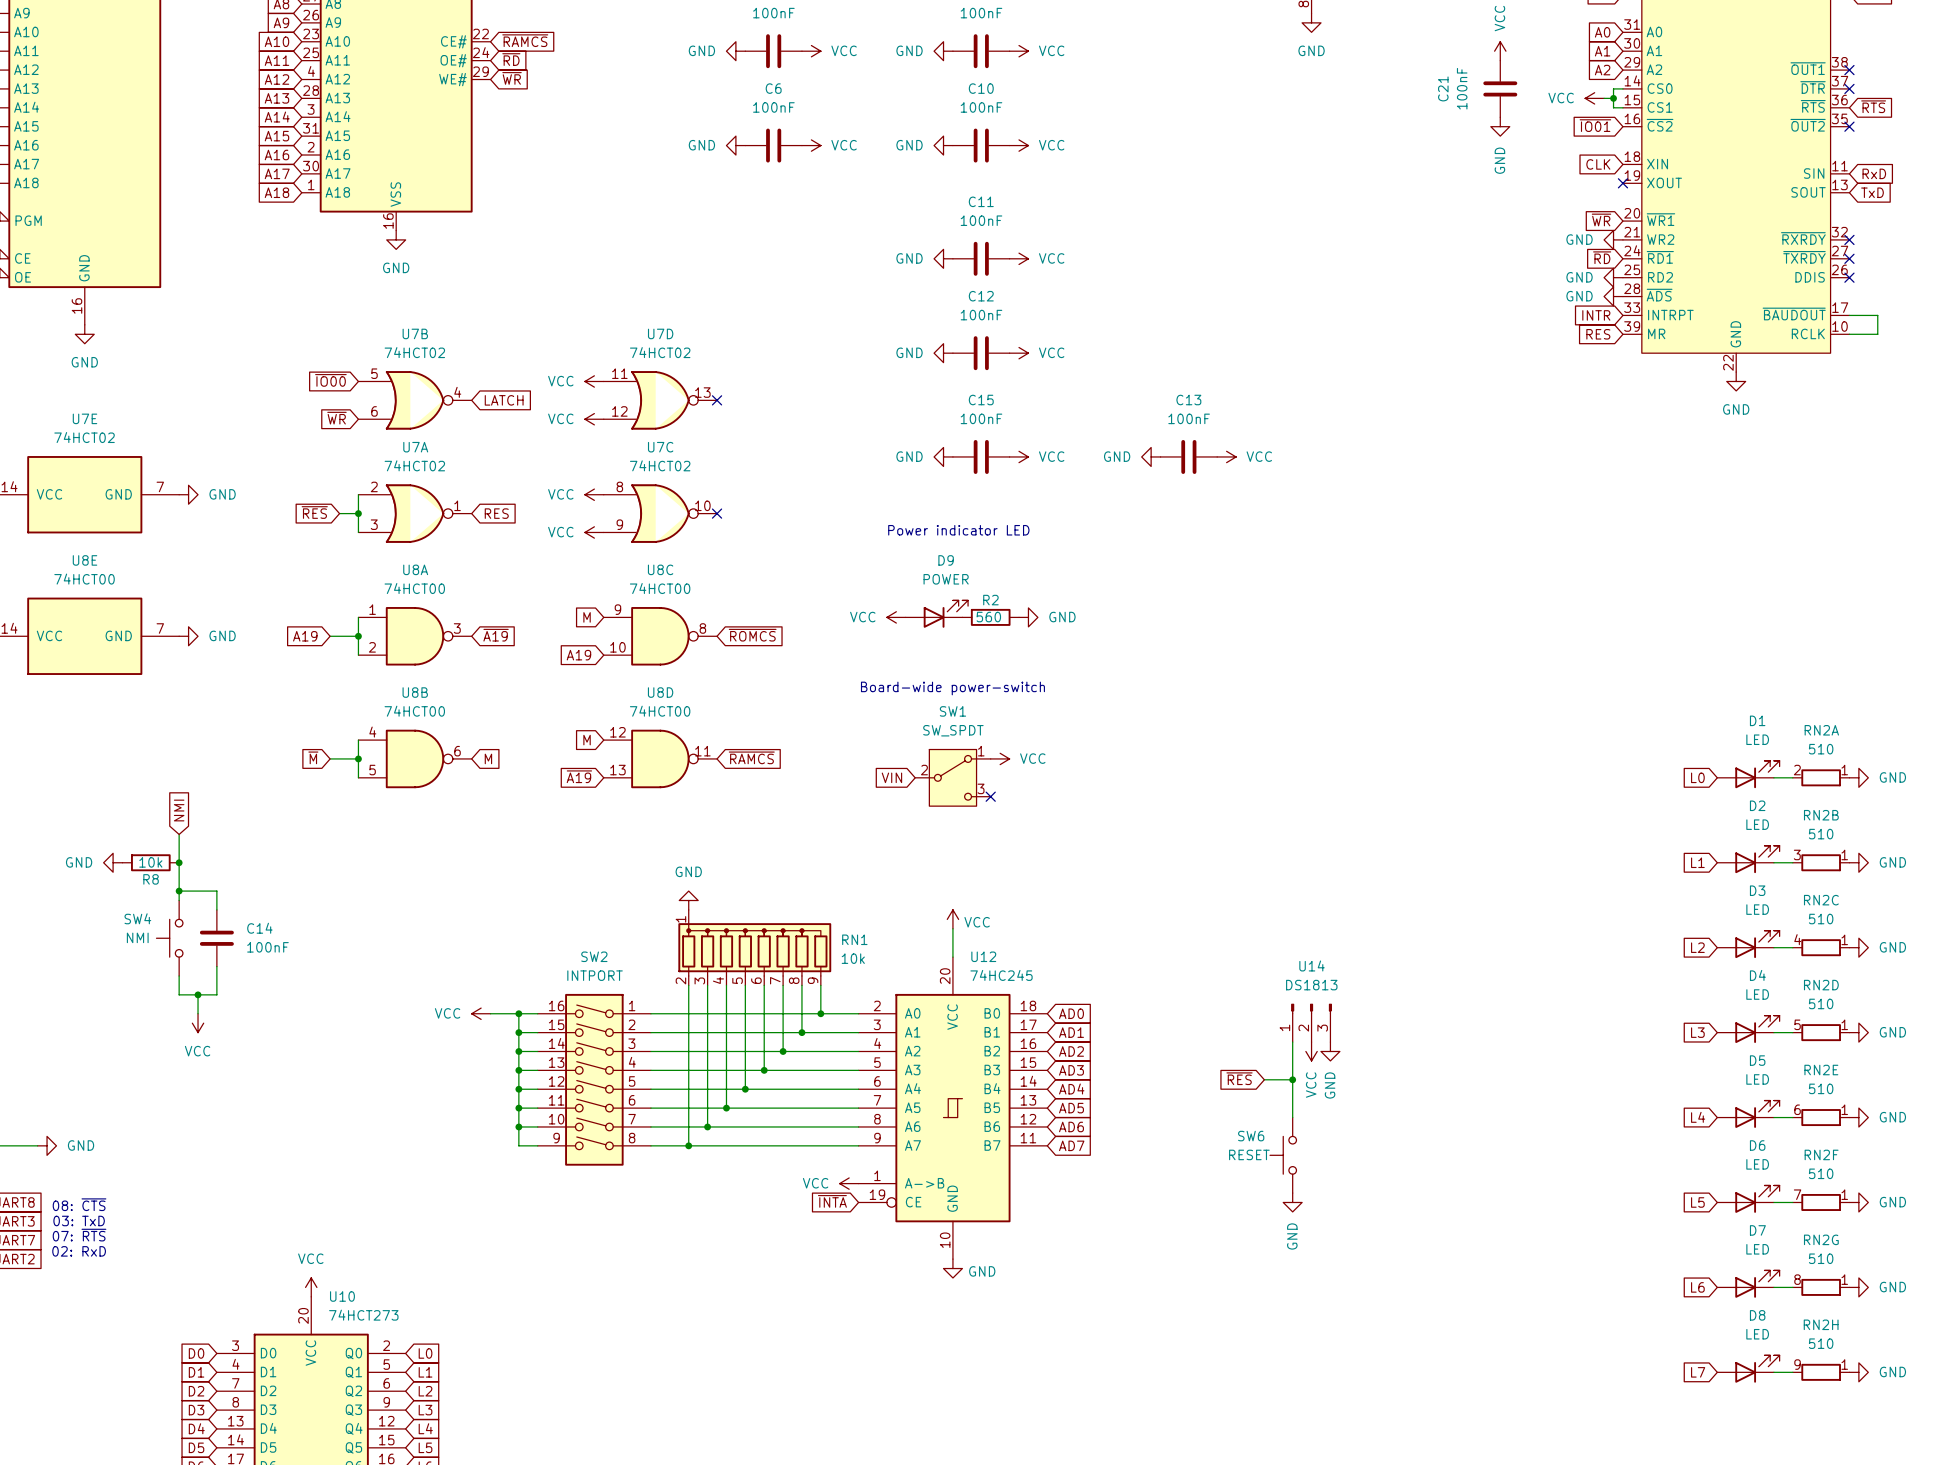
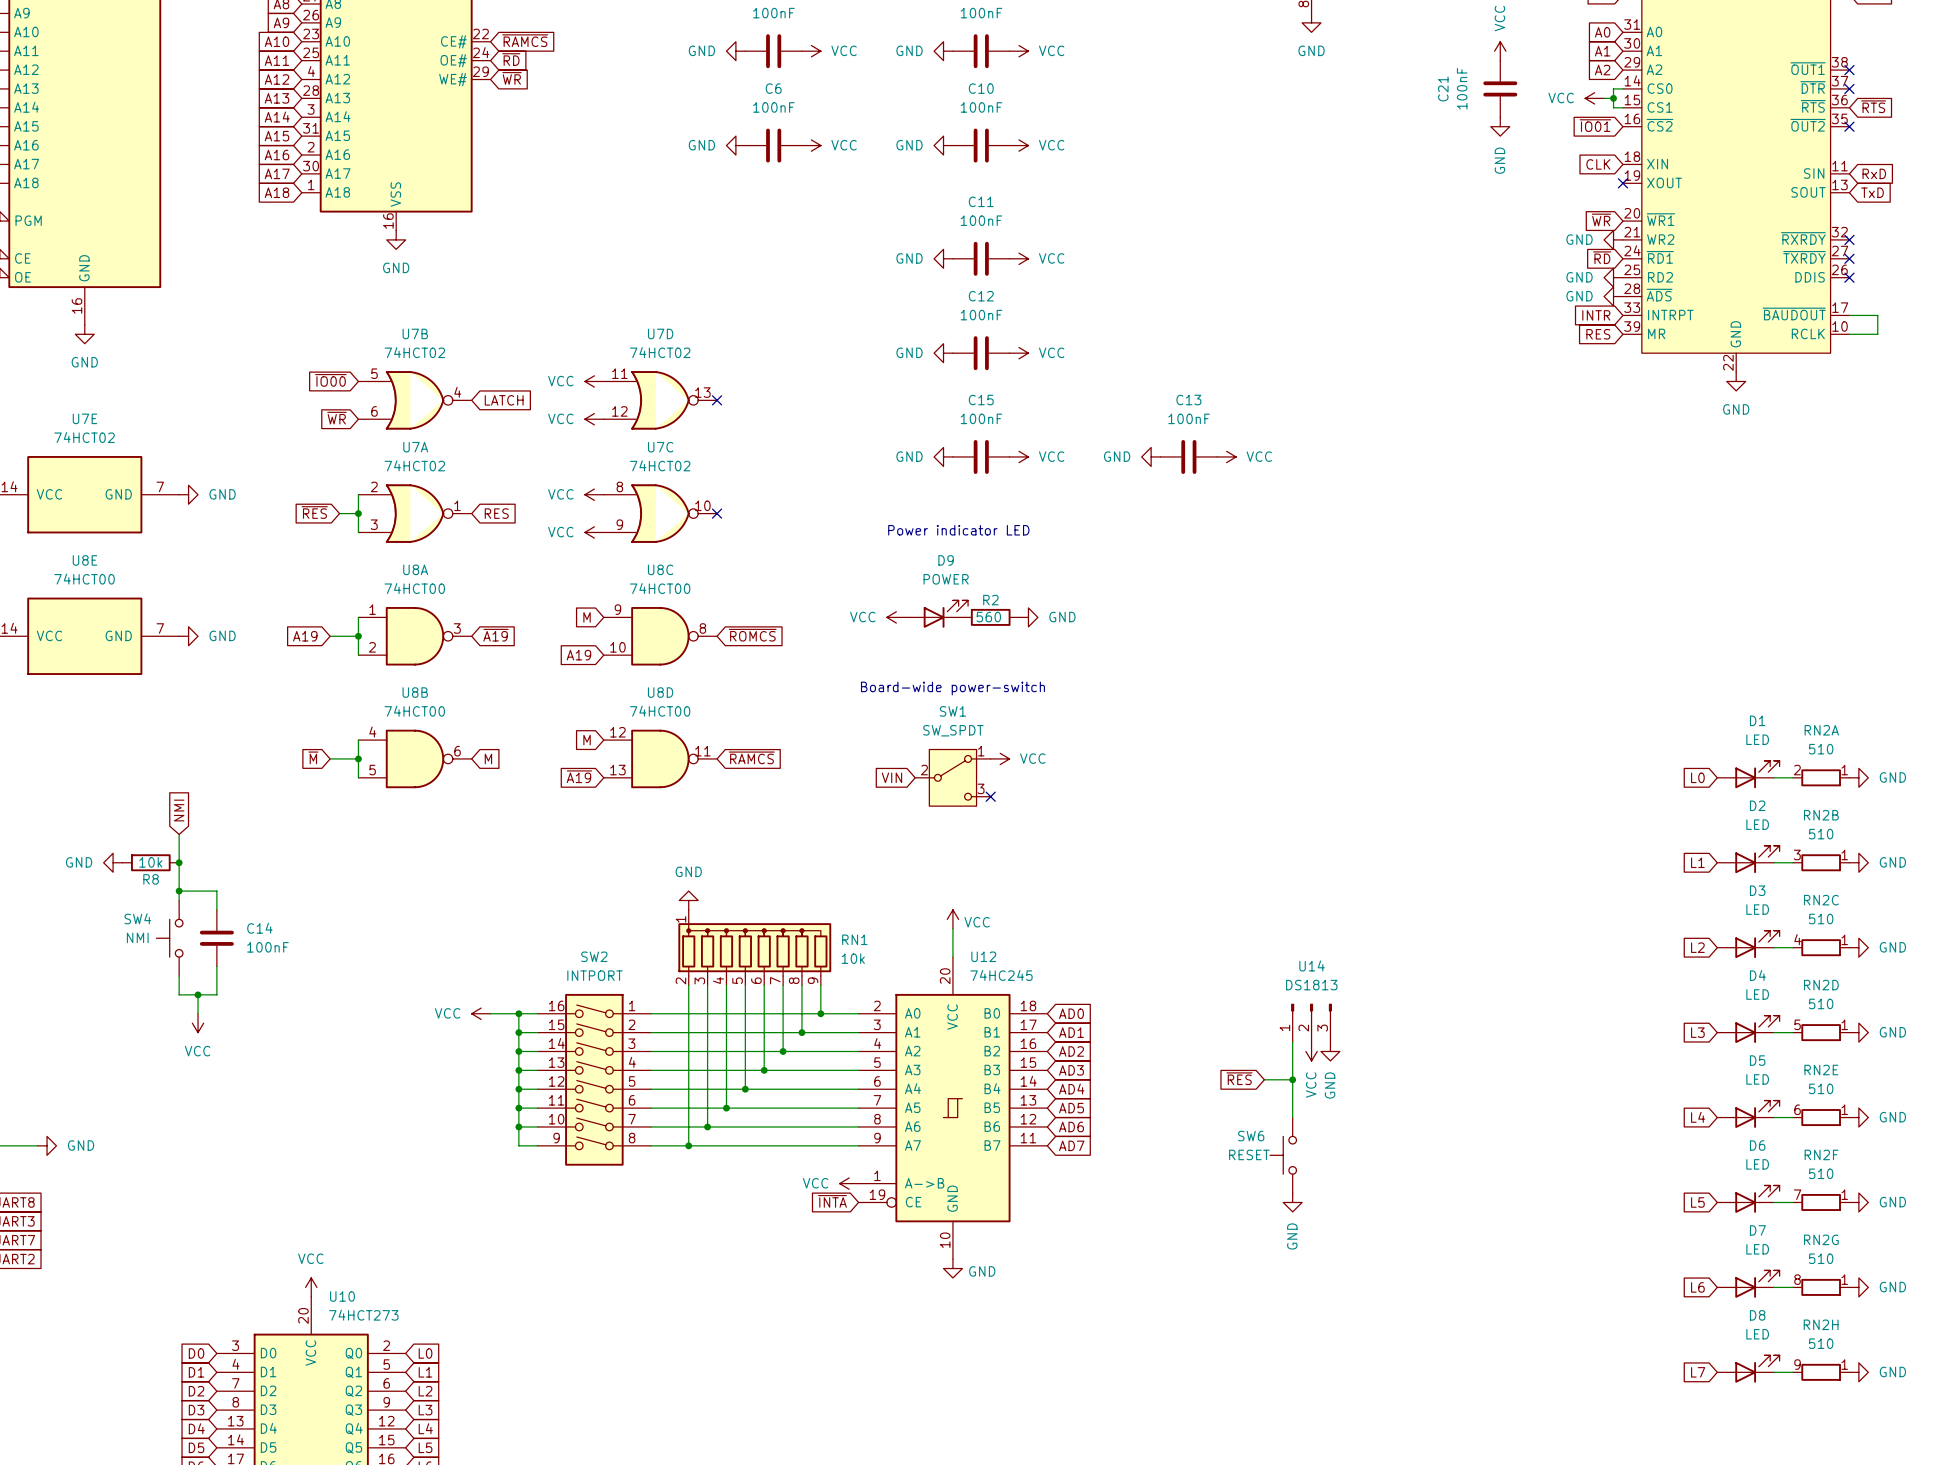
text: 08: ~{CTS} (79, 1204) -> none
text: 03: TxD (79, 1220) -> none
text: 07: ~{RTS} (79, 1235) -> none
text: 02: RxD (79, 1251) -> none

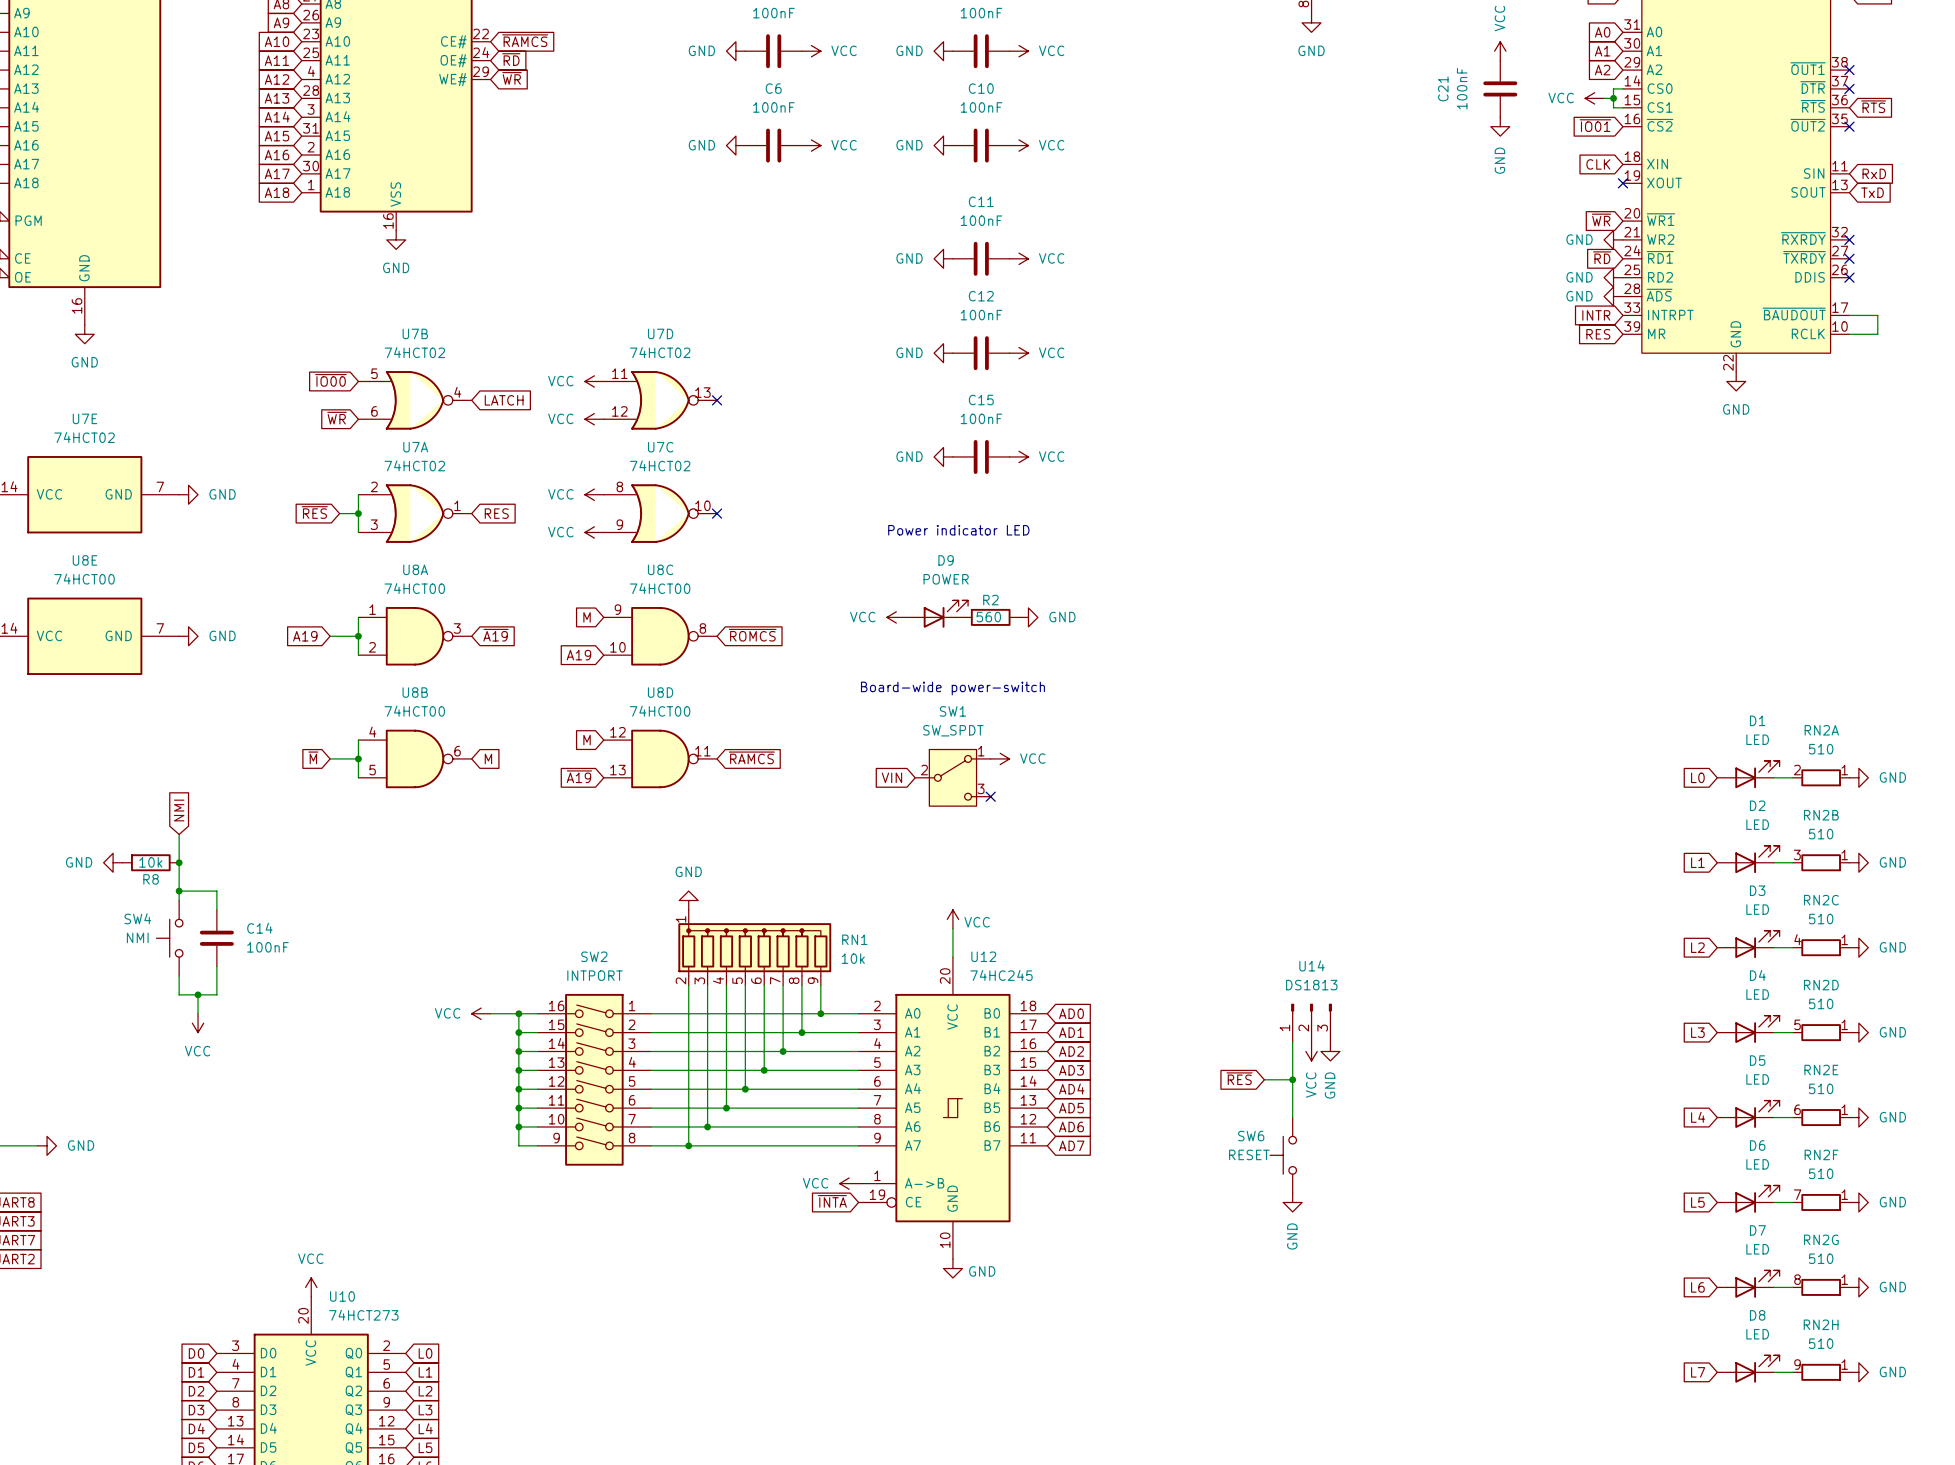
power symbol: GND (1151, 456) -> none
C13: 100nF (1188, 456) -> none
power symbol: VCC (1226, 456) -> none

